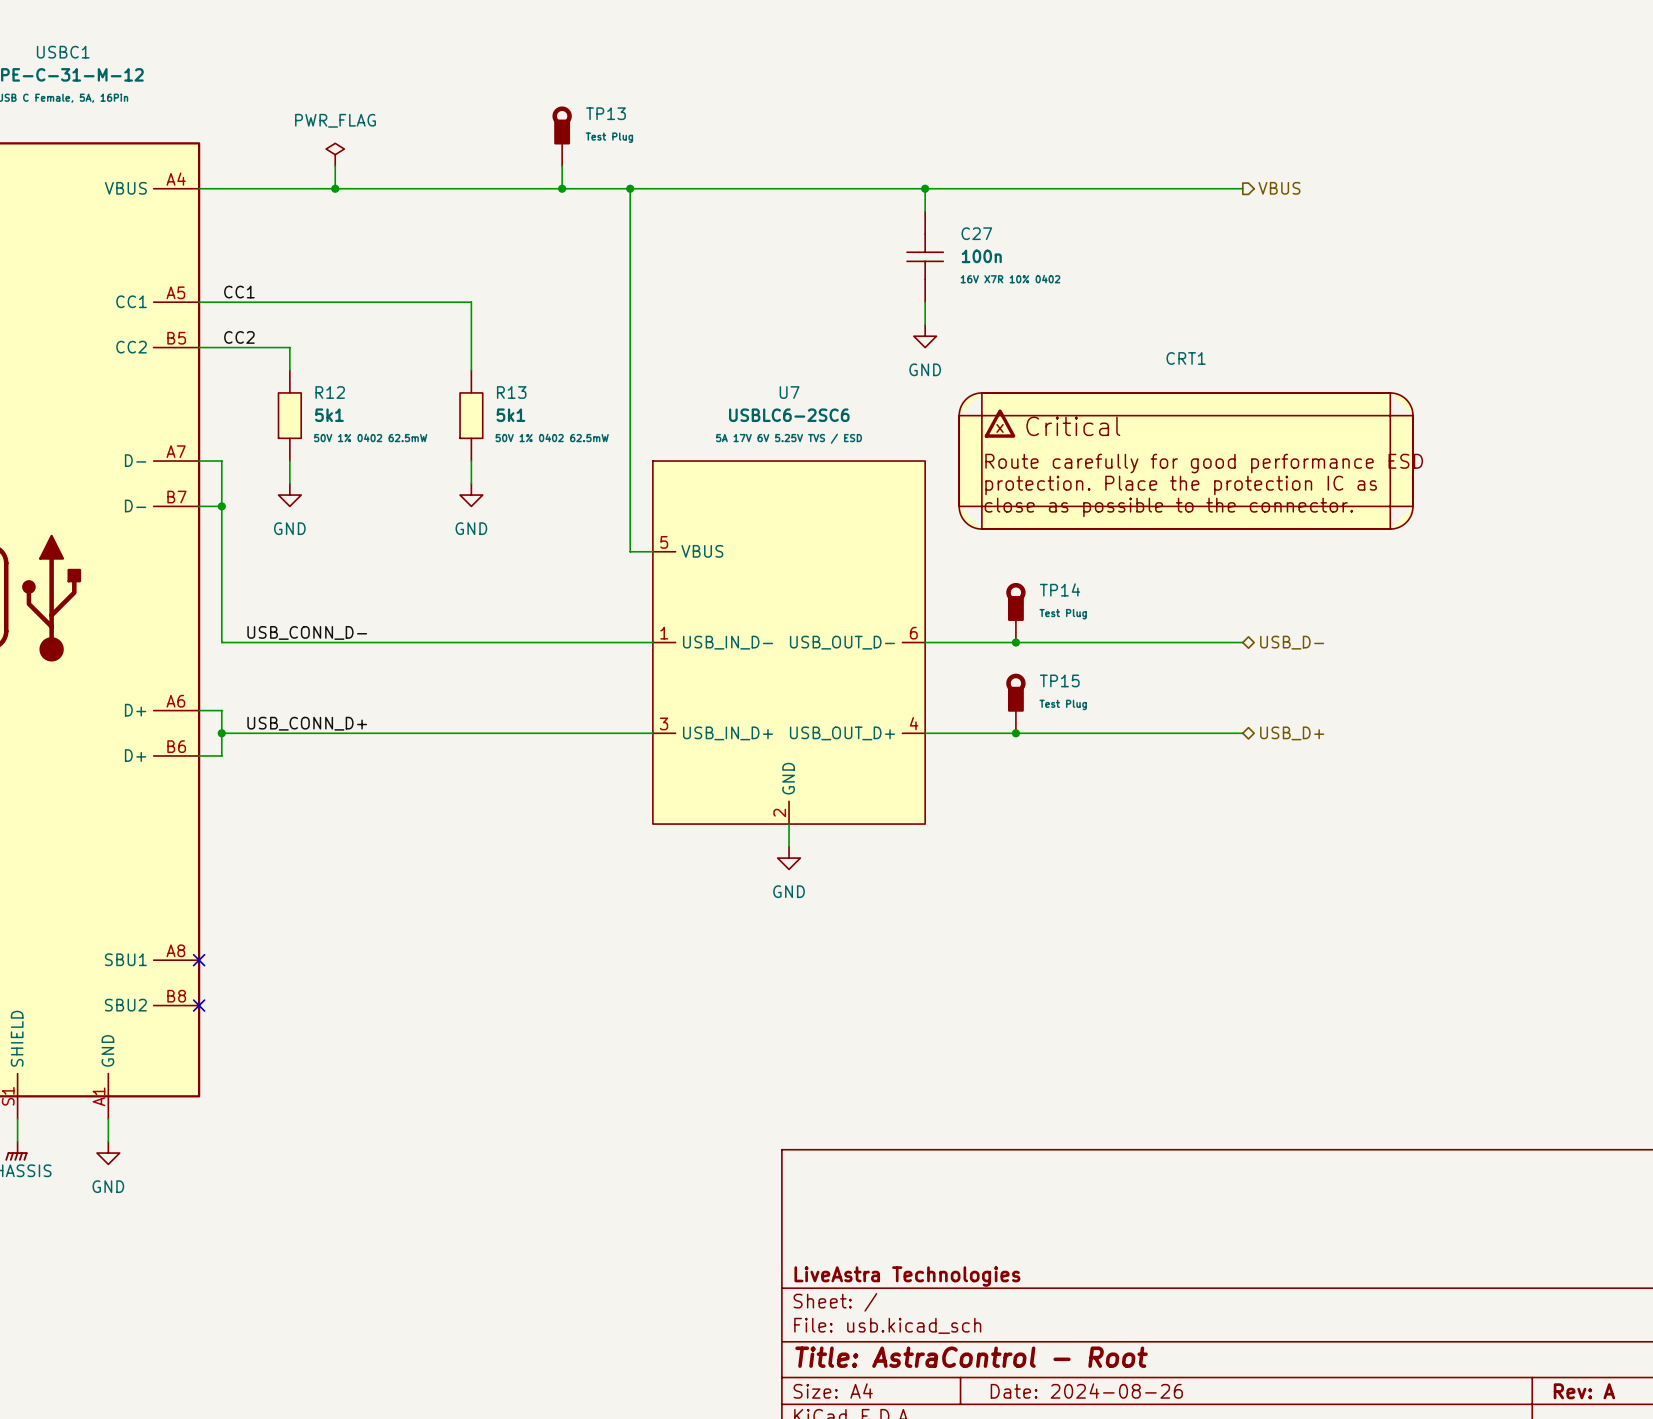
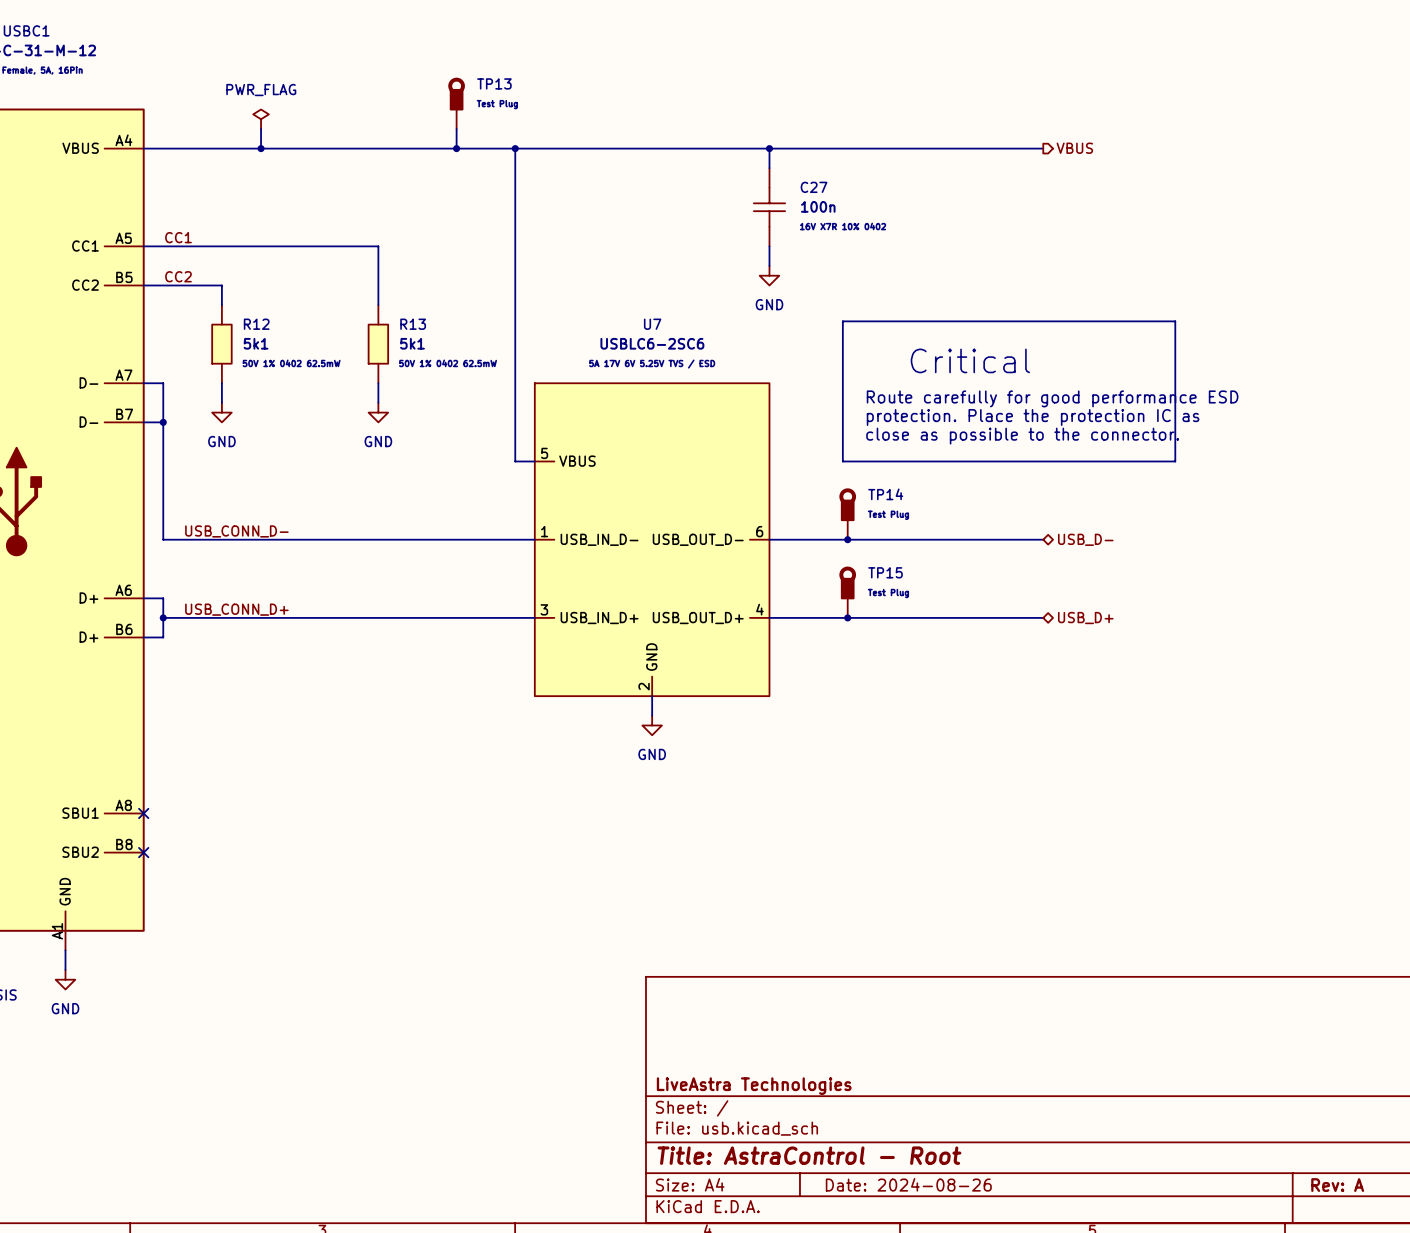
line: none -> (842, 321) (1175, 321) (1175, 461) (842, 461) (842, 321)
text: none -> Critical (970, 360)
CRT1: (1186, 461) -> none
text: none -> Route carefully for good performance ESD (1052, 398)
text: none -> protection. Place the protection IC as (1033, 417)
text: none -> close as possible to the connector. (1022, 436)

